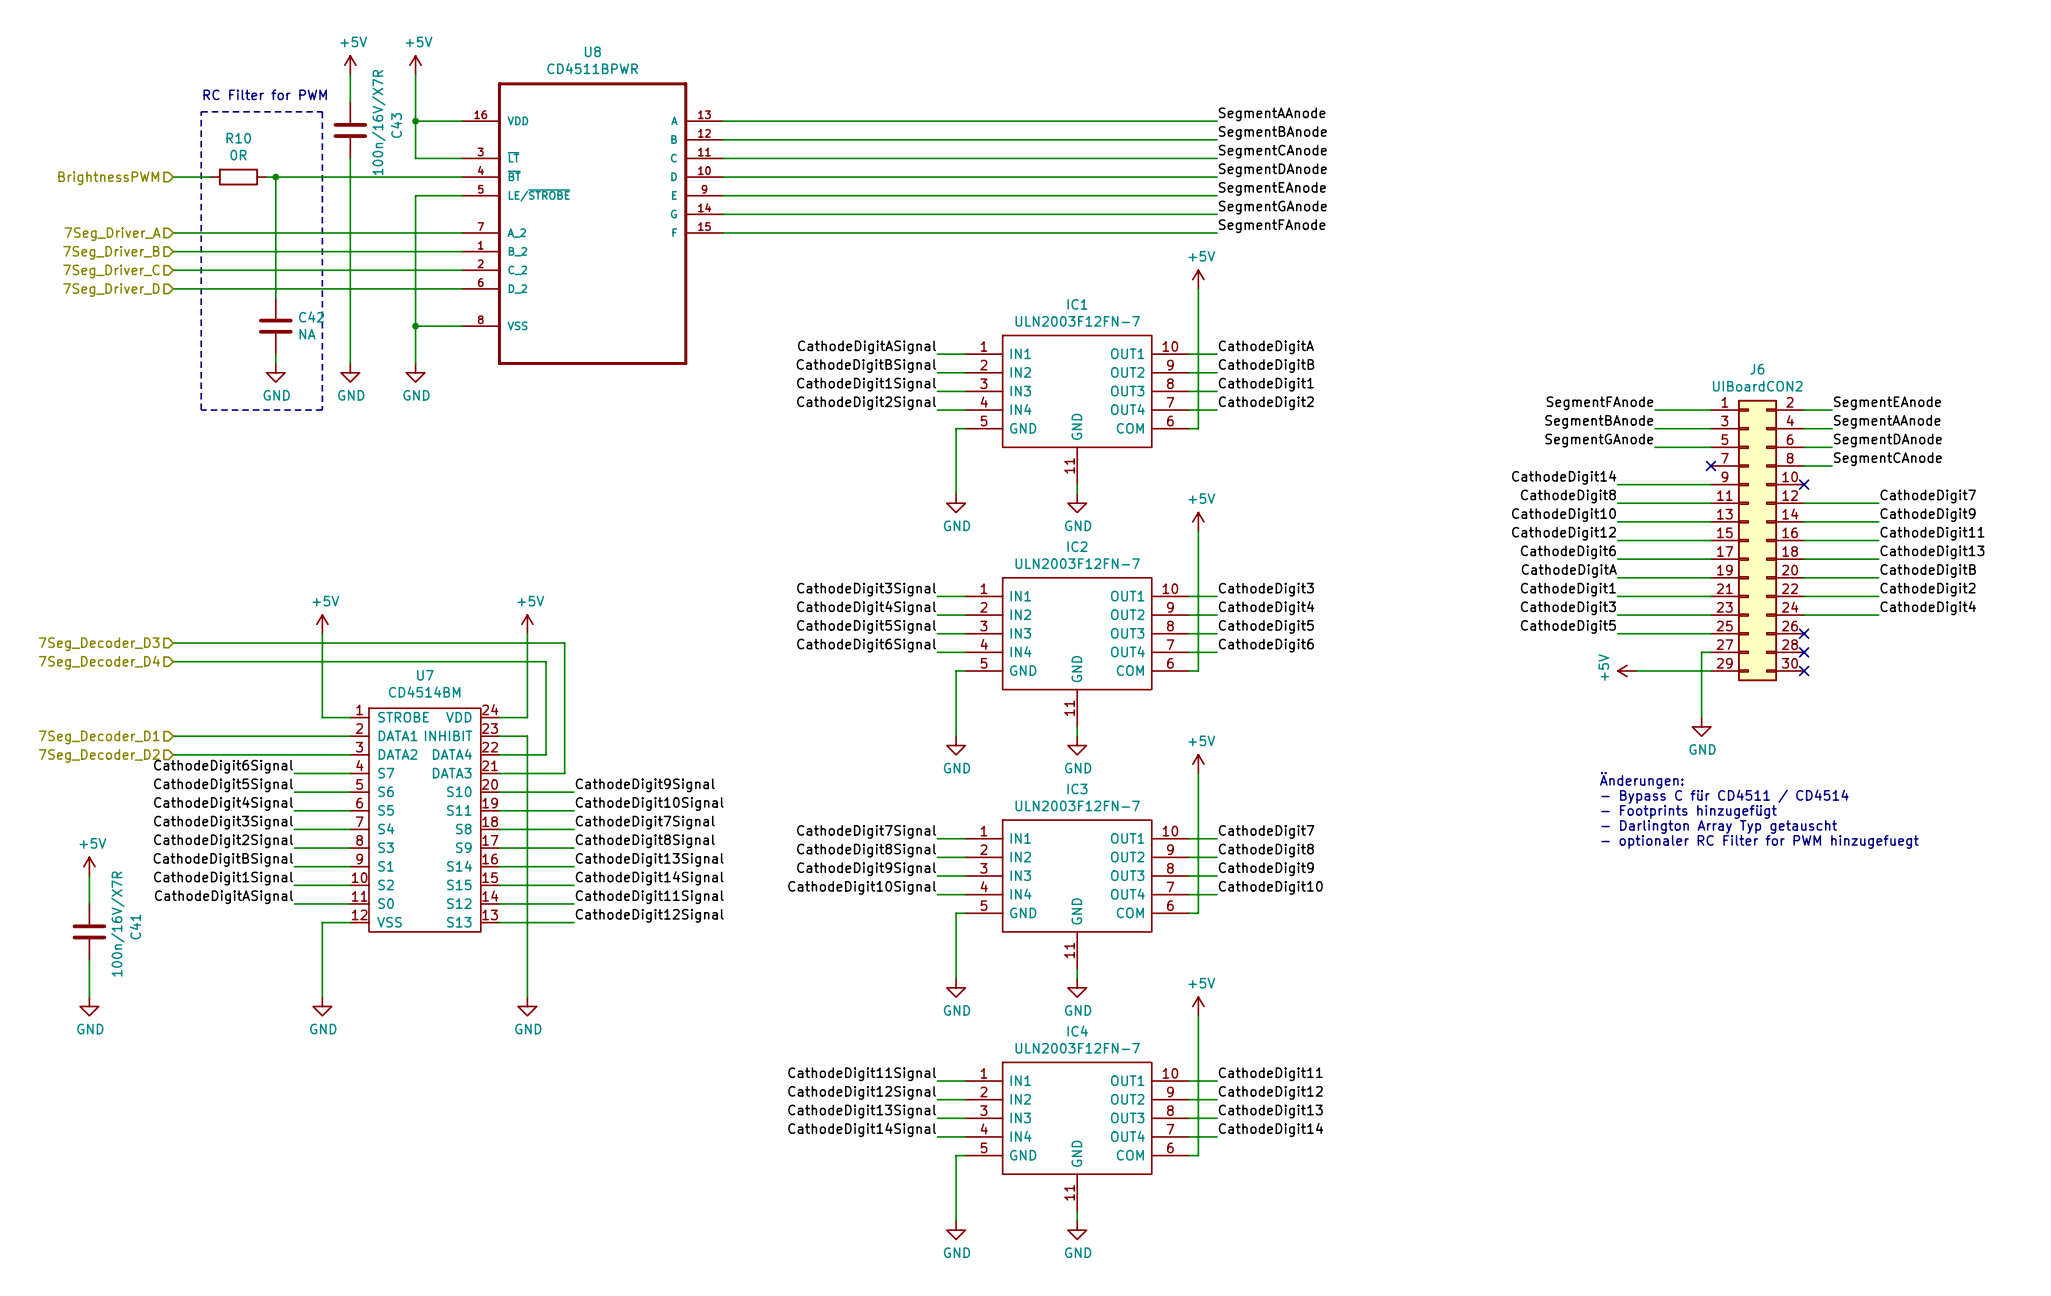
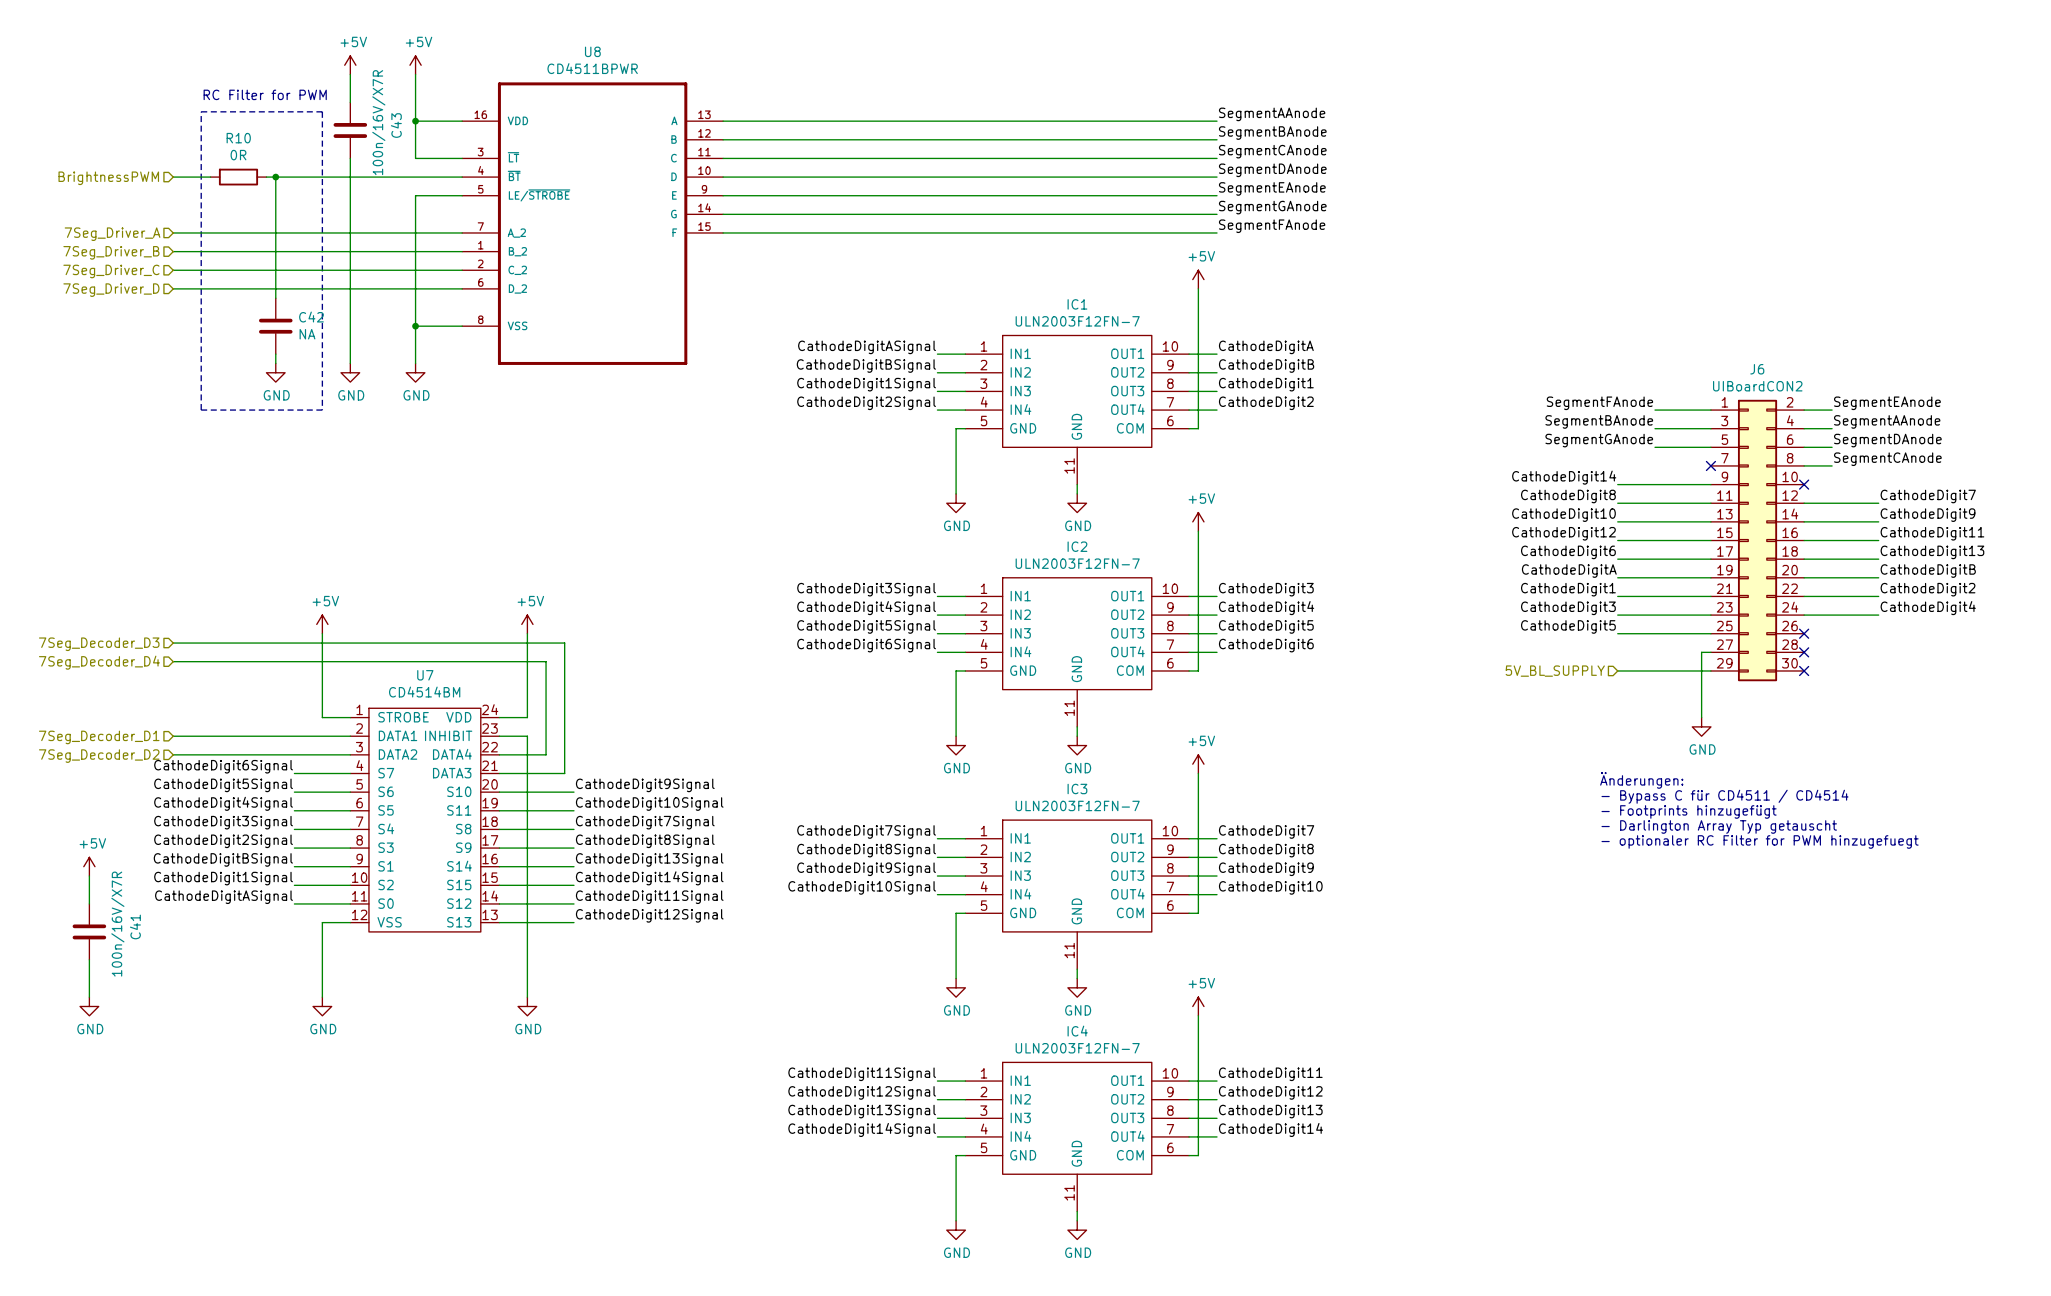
power symbol: +5V (1627, 670) -> none
hierarchical label: none -> 5V_BL_SUPPLY (1555, 671)

